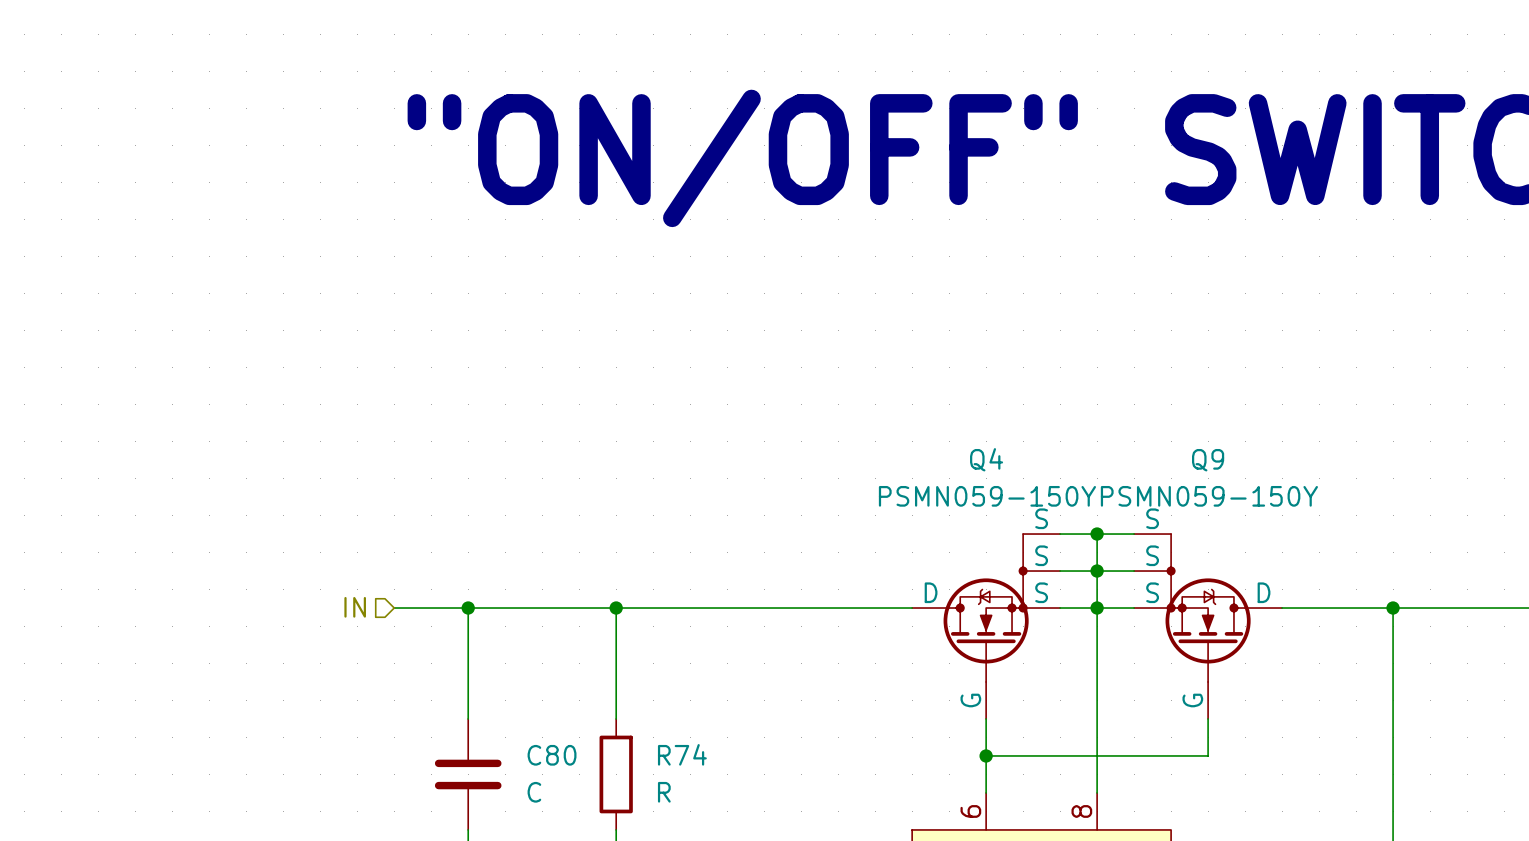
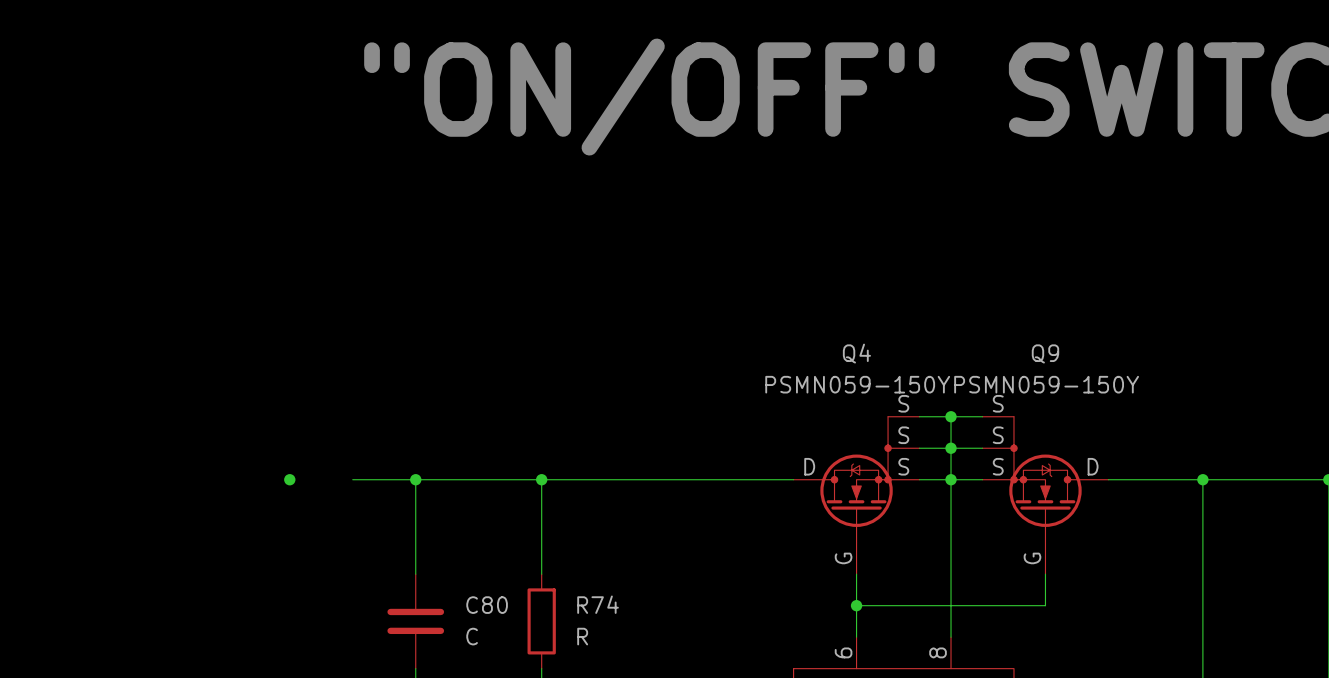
hierarchical label: IN (355, 607) -> none
junction: none -> (289, 479)

